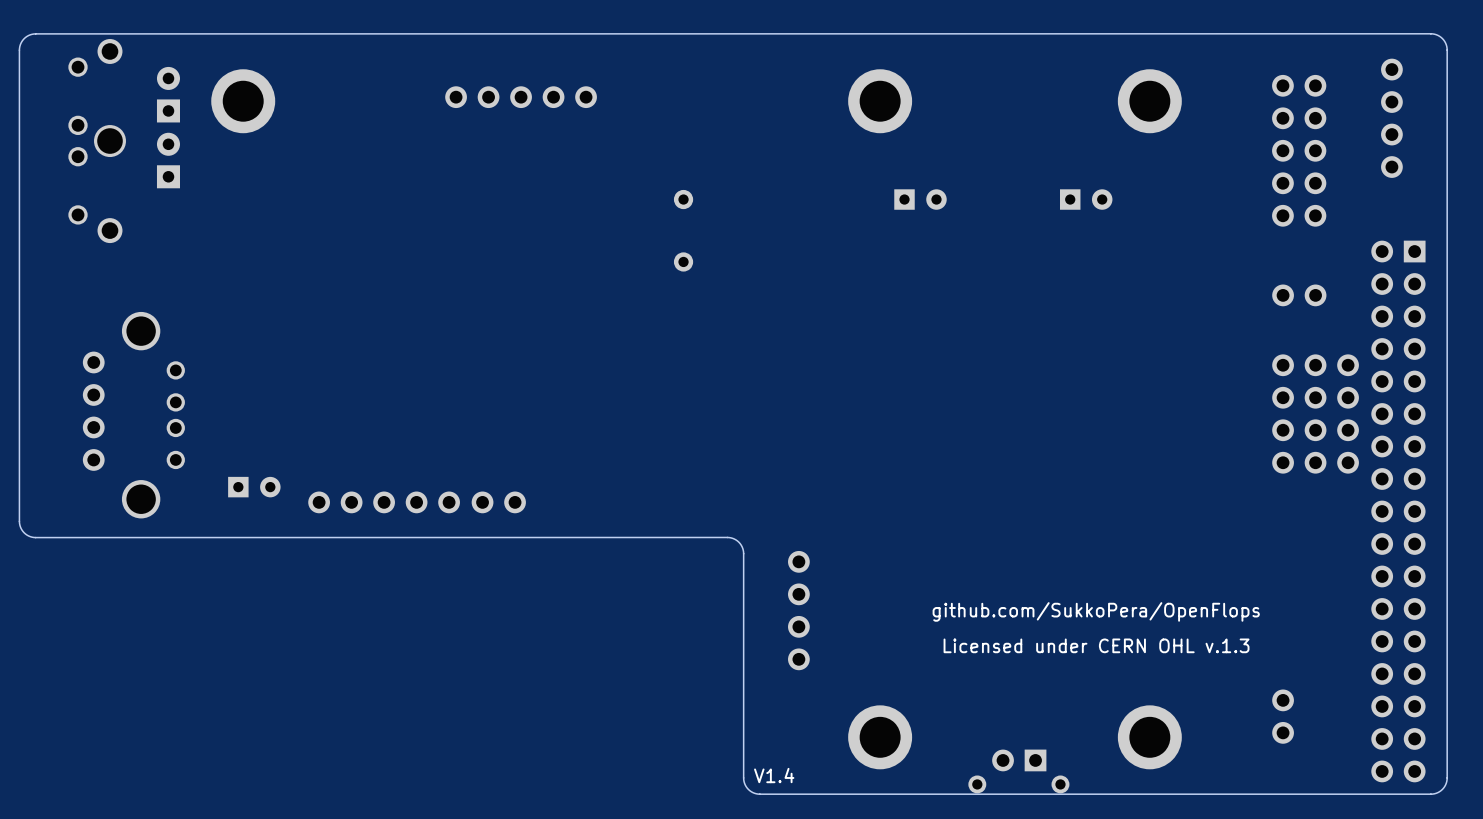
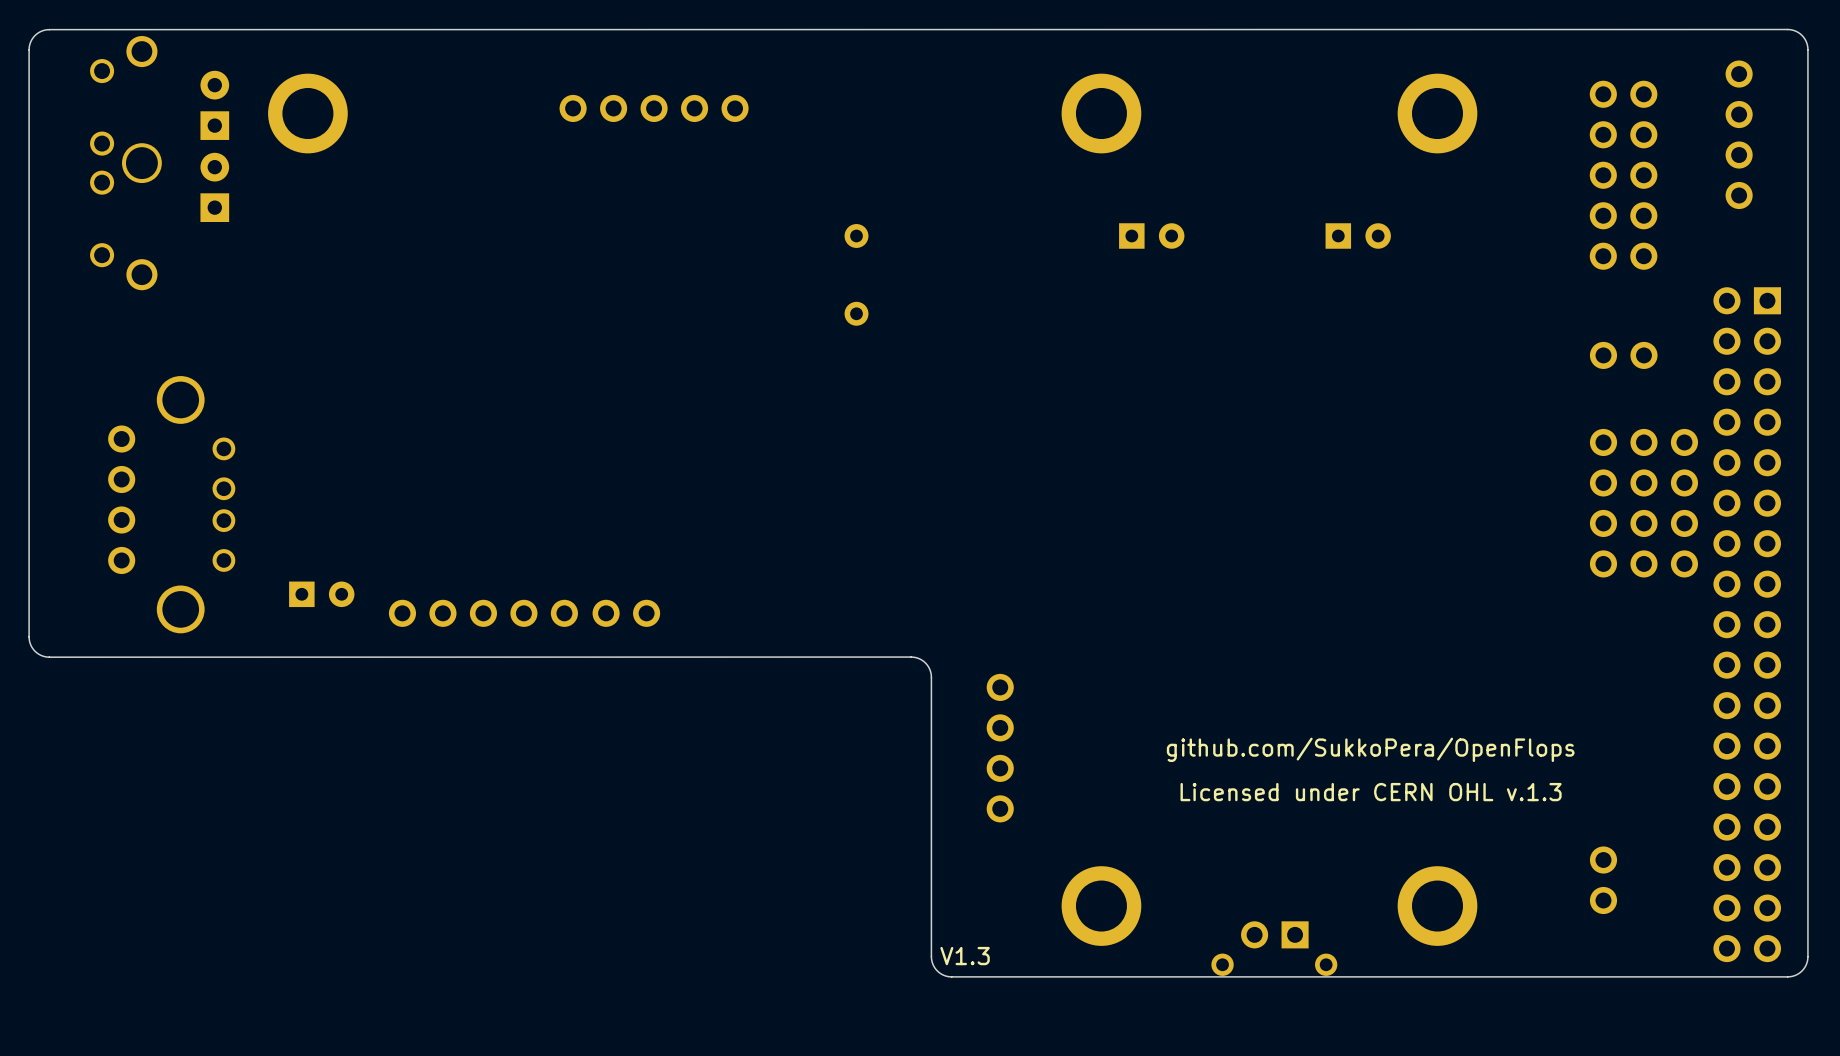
text: V1.4 (774, 775) -> V1.3 (965, 956)

